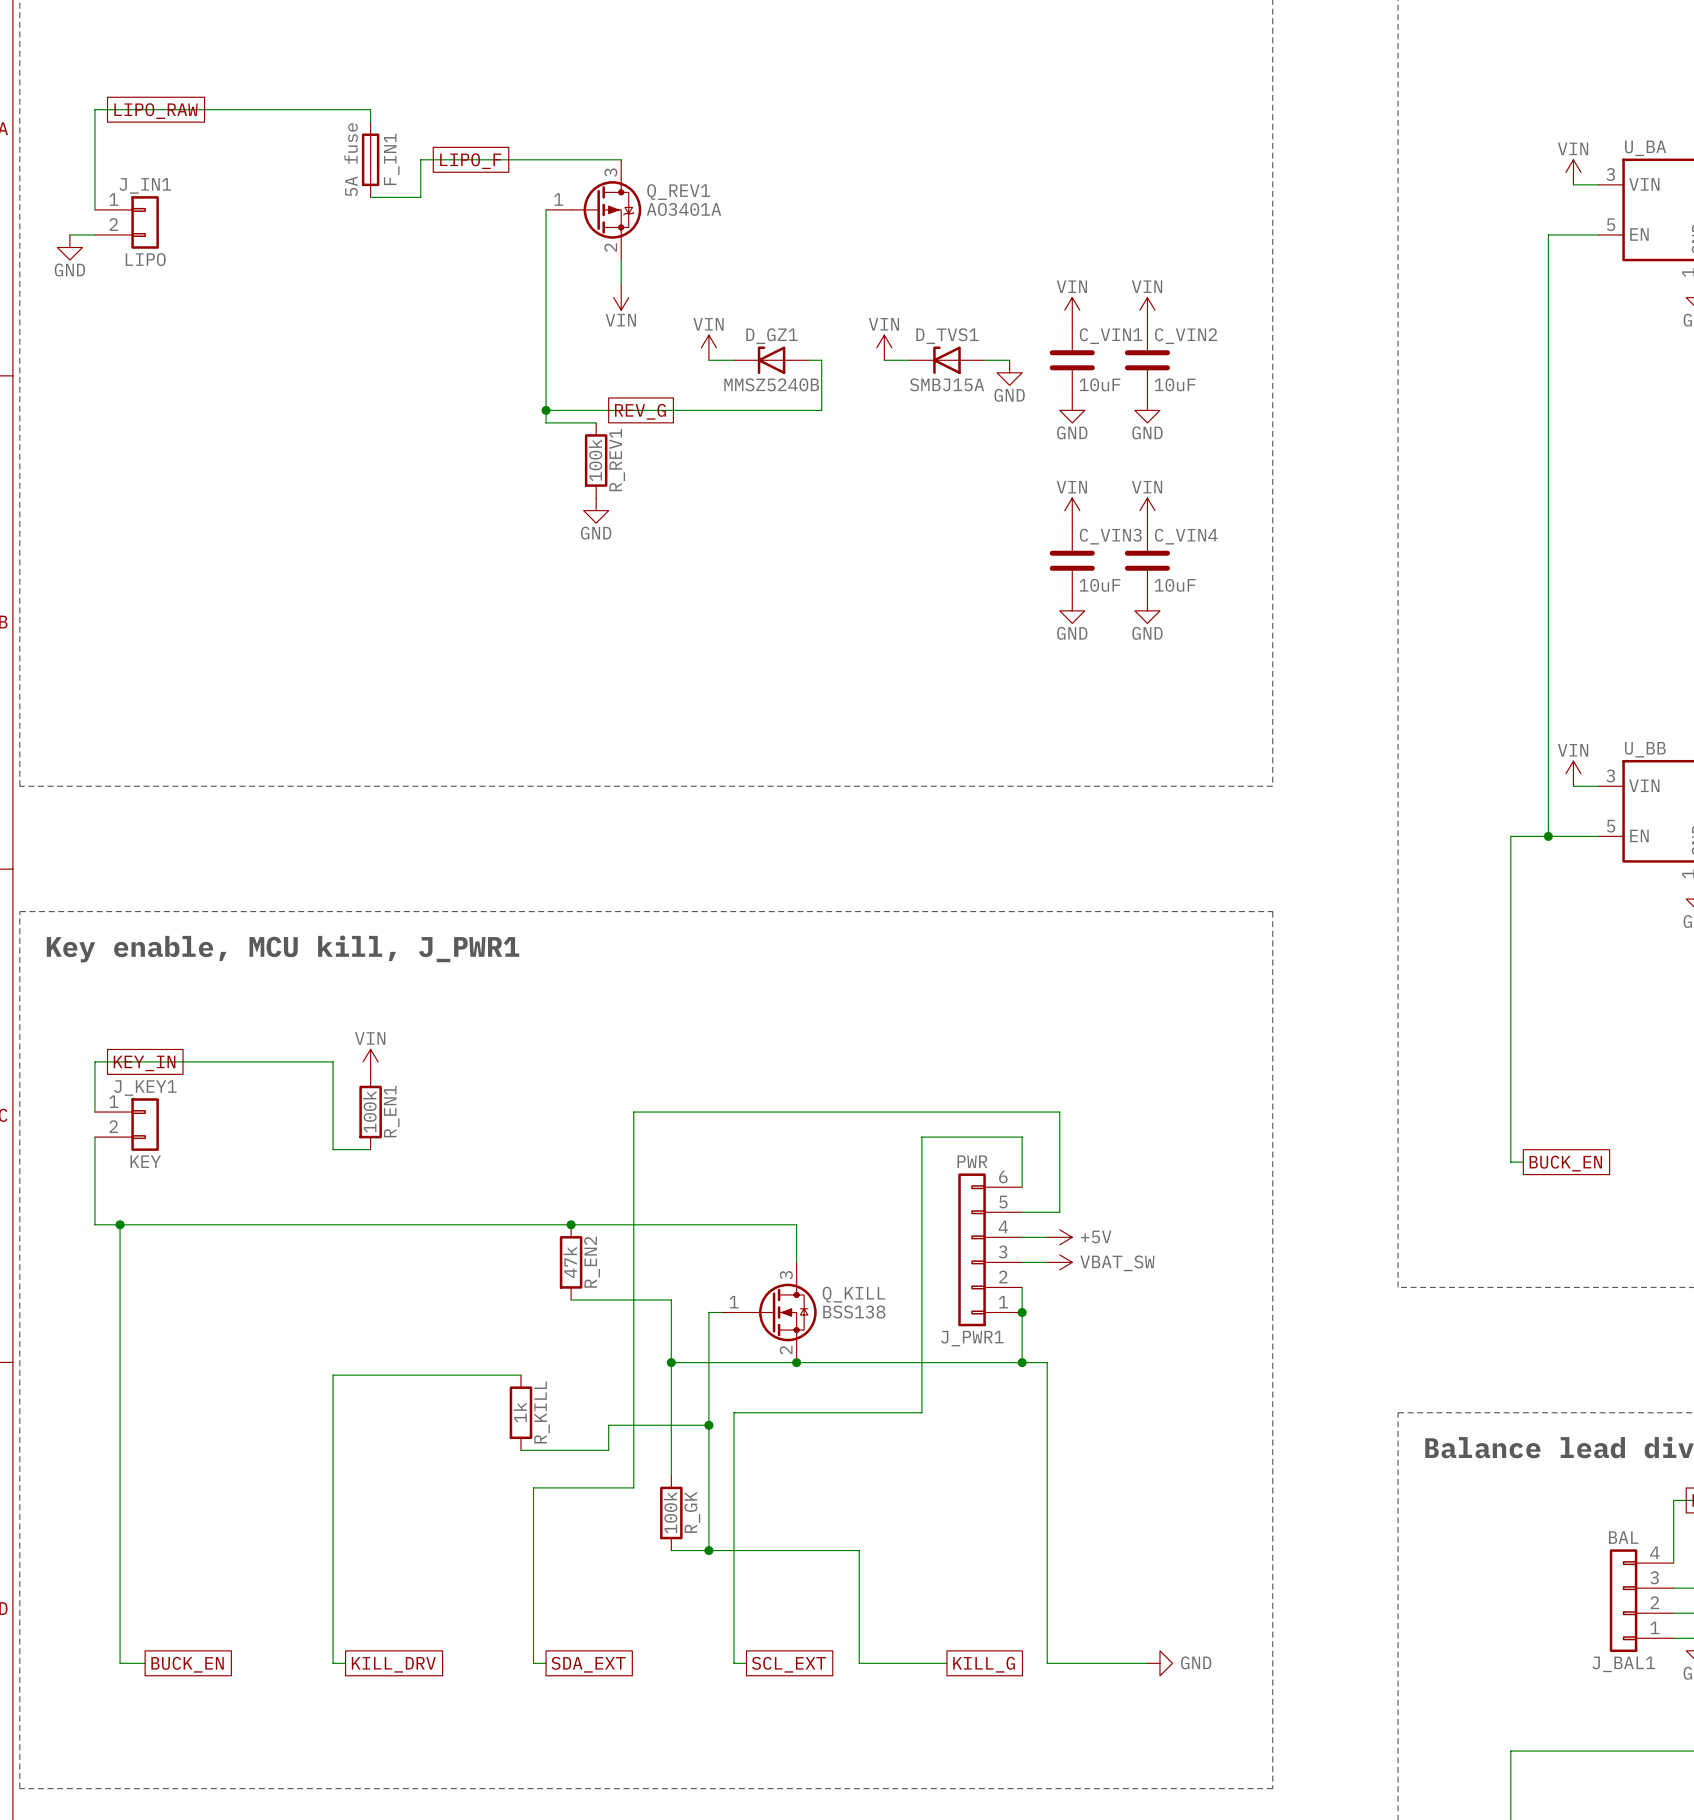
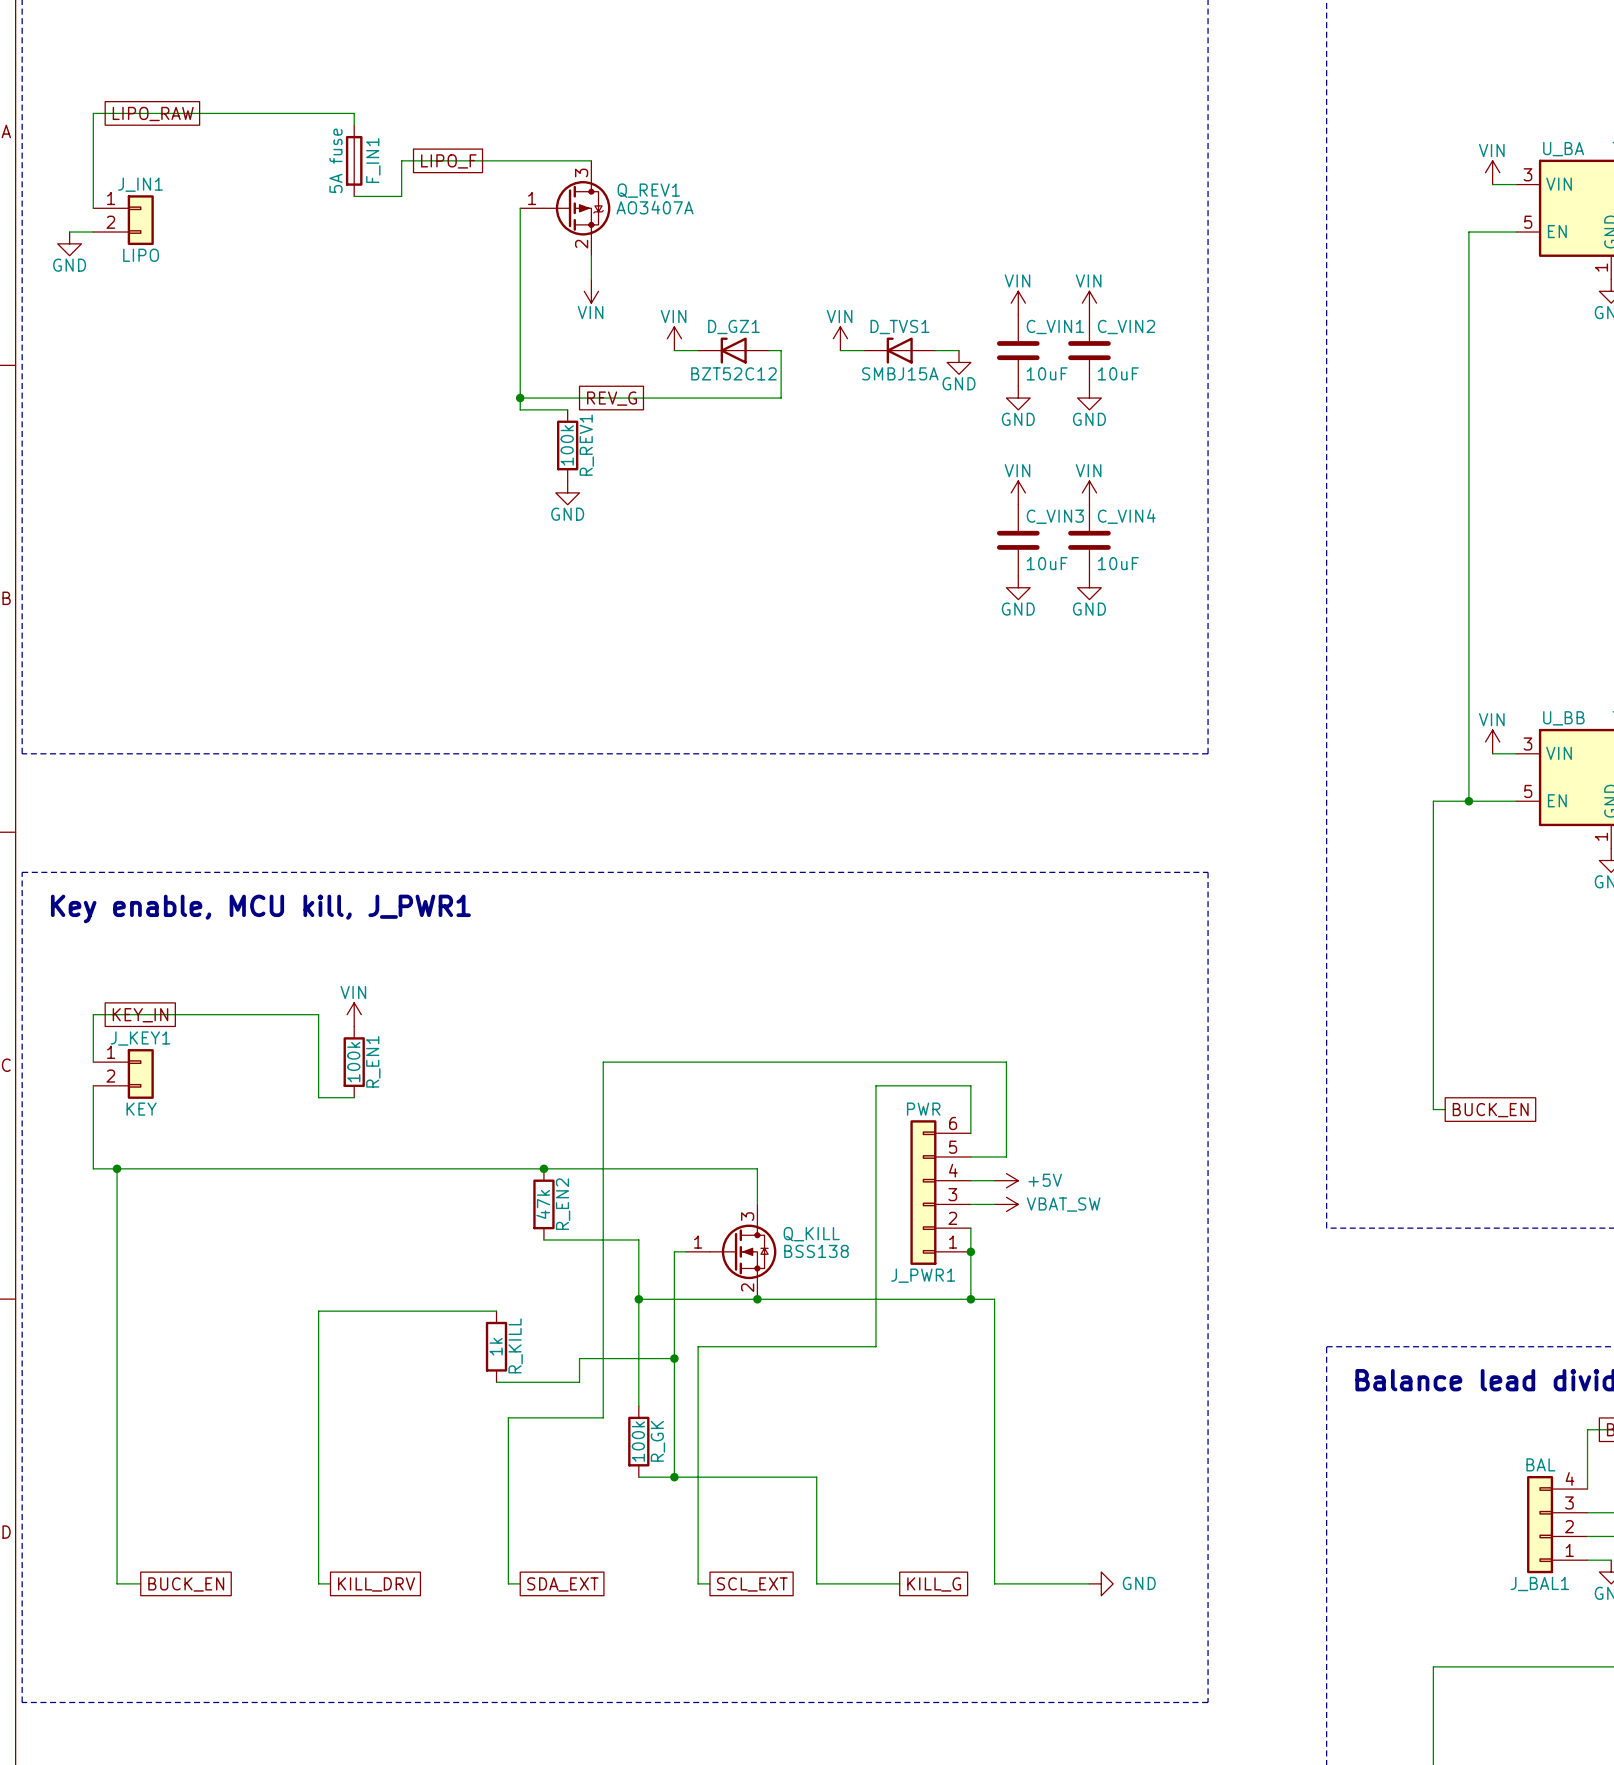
Q_REV1 value: AO3401A (683, 209) -> AO3407A (655, 207)
D_GZ1 value: MMSZ5240B (771, 384) -> BZT52C12 (733, 373)

